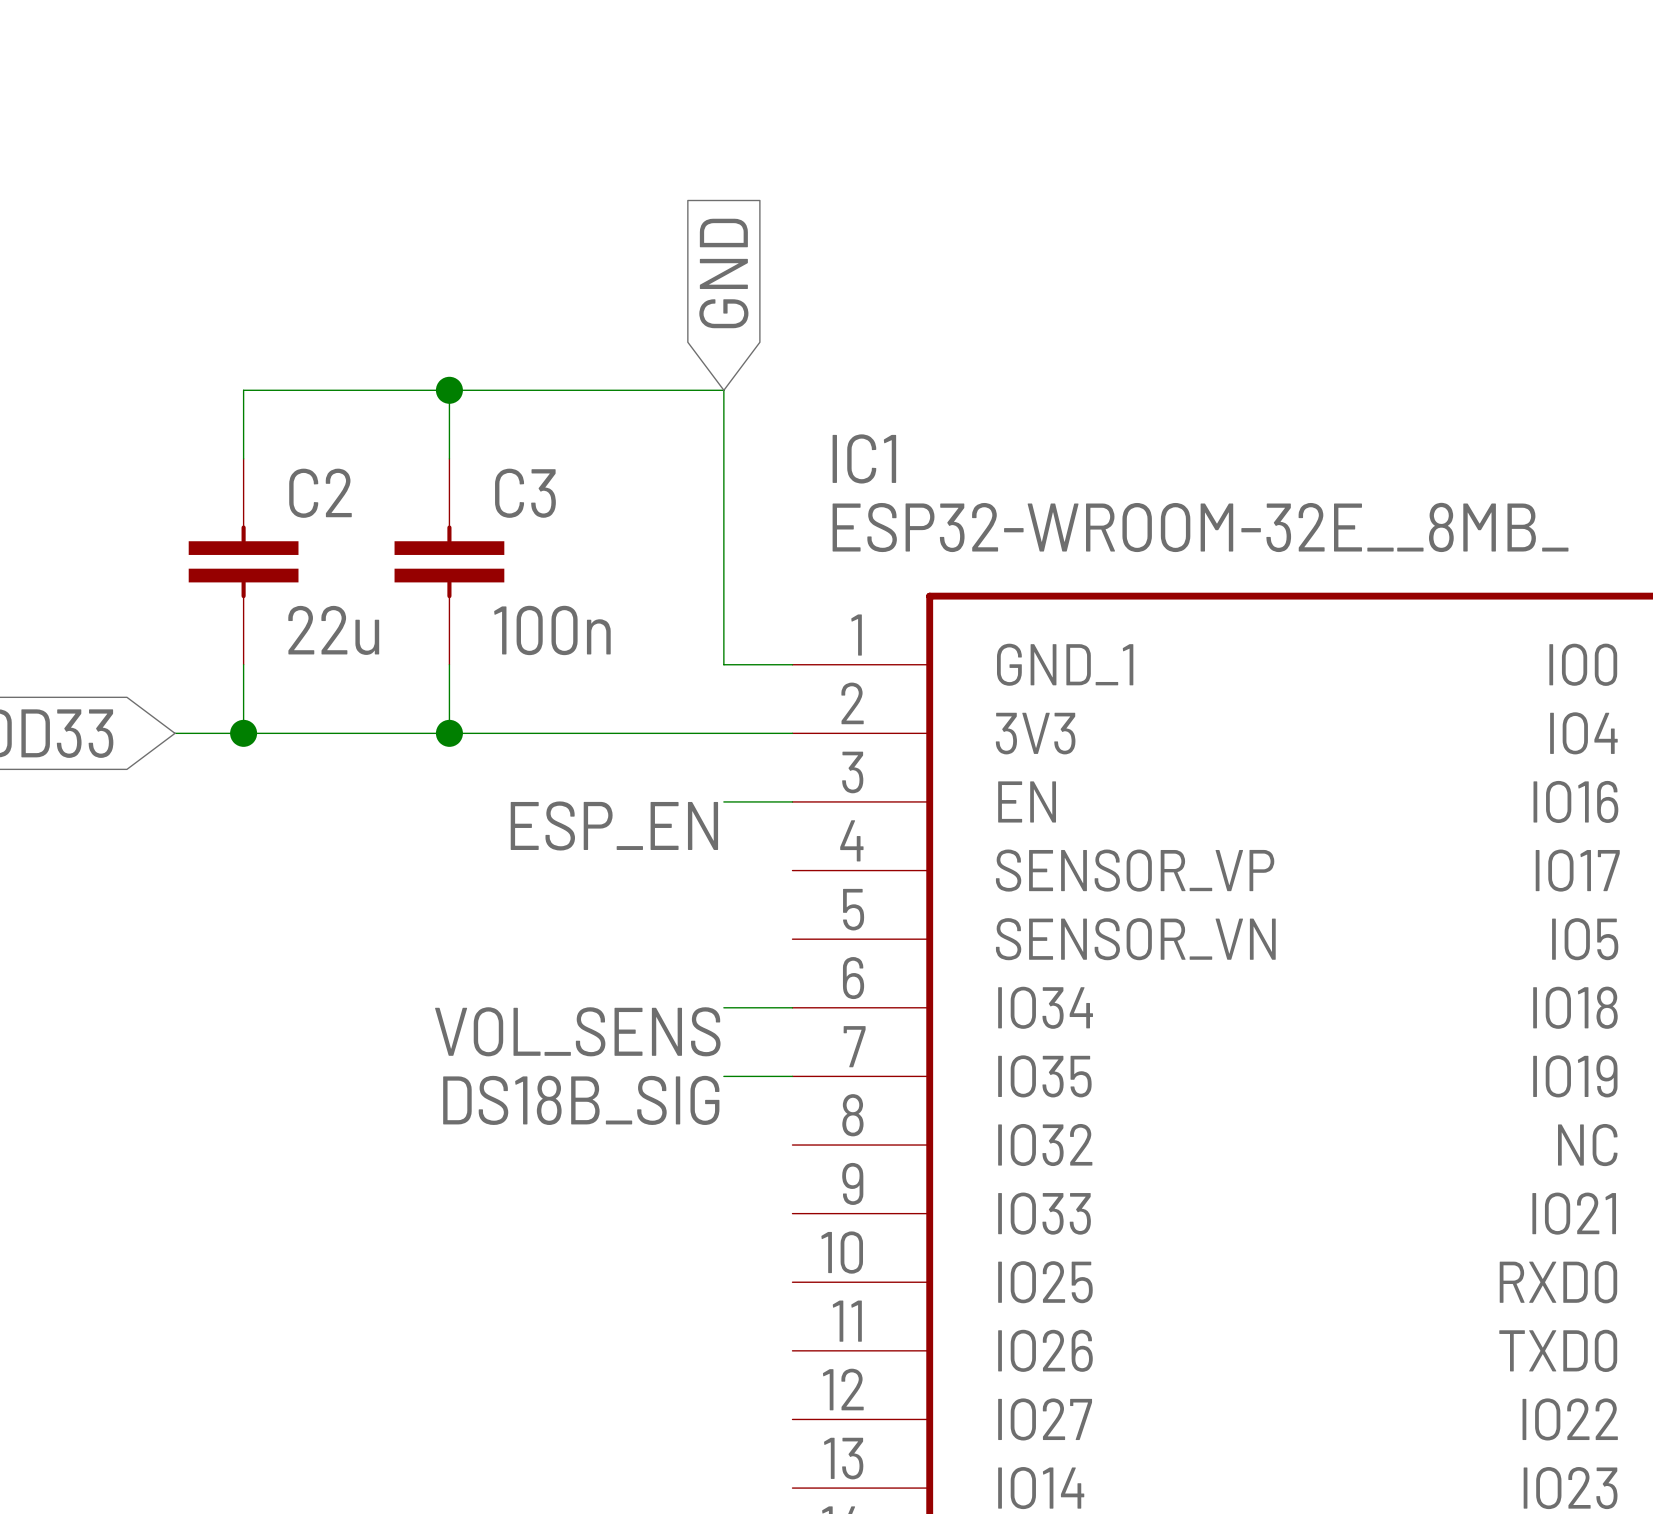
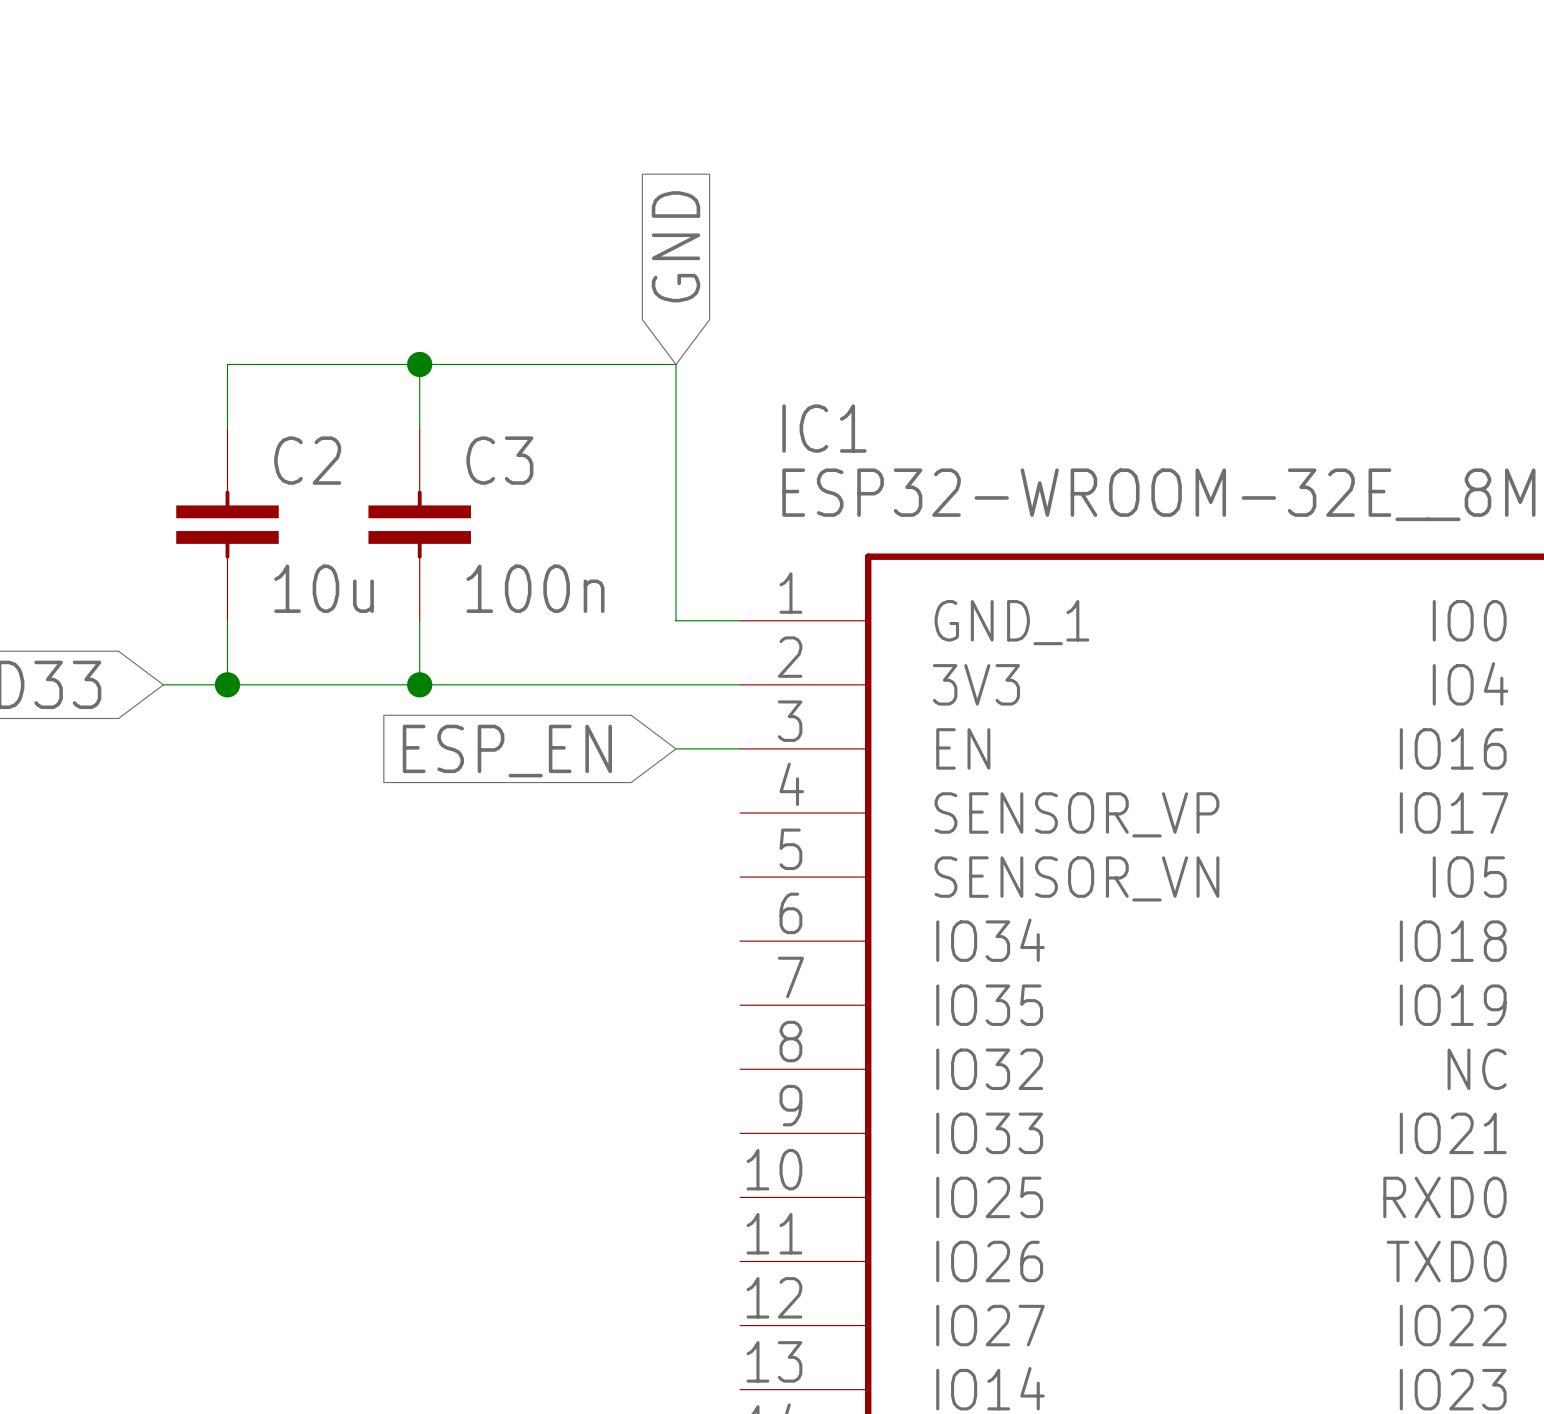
C2 value: 22u (333, 630) -> 10u (324, 588)
global label: none -> ESP_EN (507, 751)
label: ESP_EN (614, 825) -> none
wire: (723, 1007) (792, 1007) -> none
label: VOL_SENS (577, 1031) -> none
wire: (723, 1076) (792, 1076) -> none
label: DS18B_SIG (581, 1100) -> none

